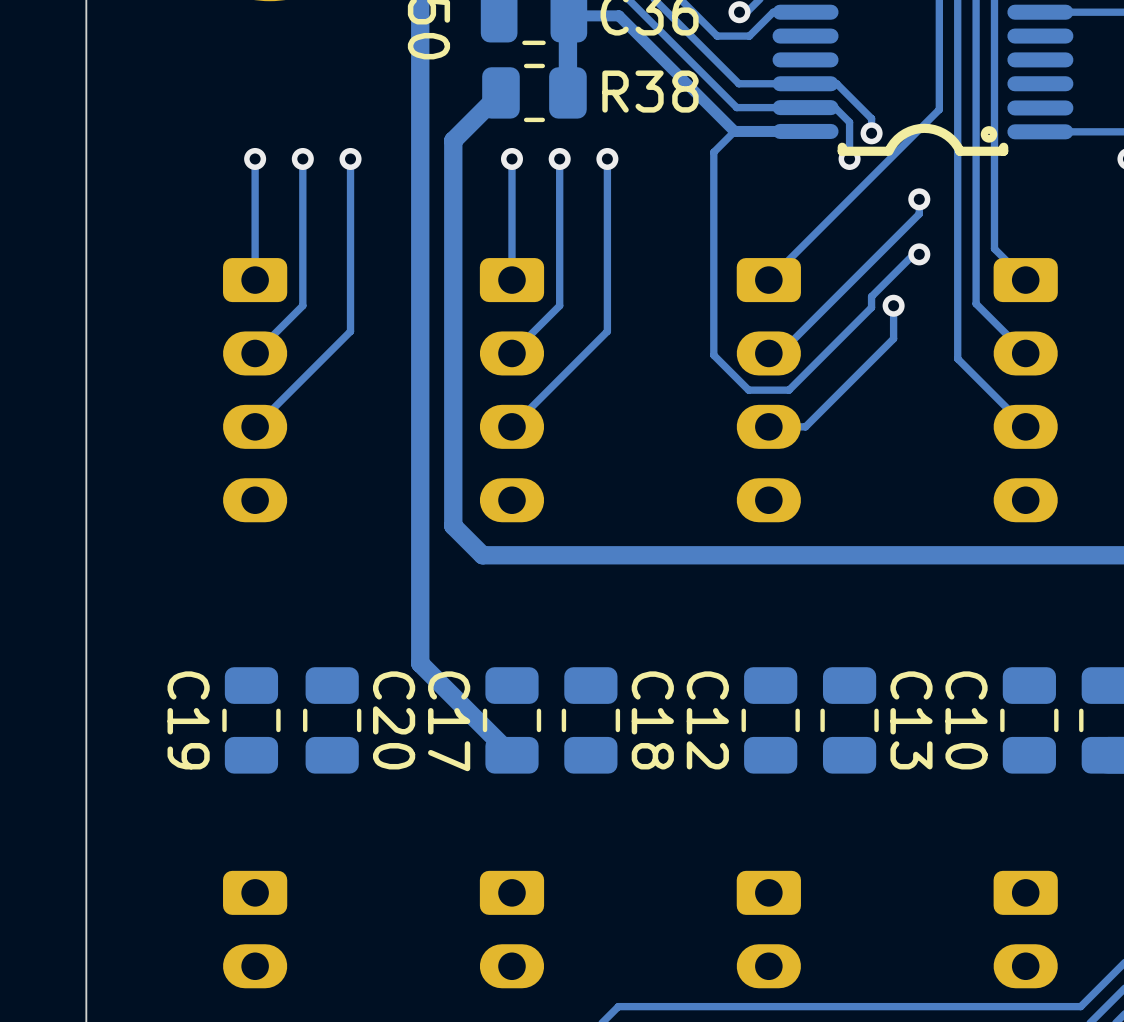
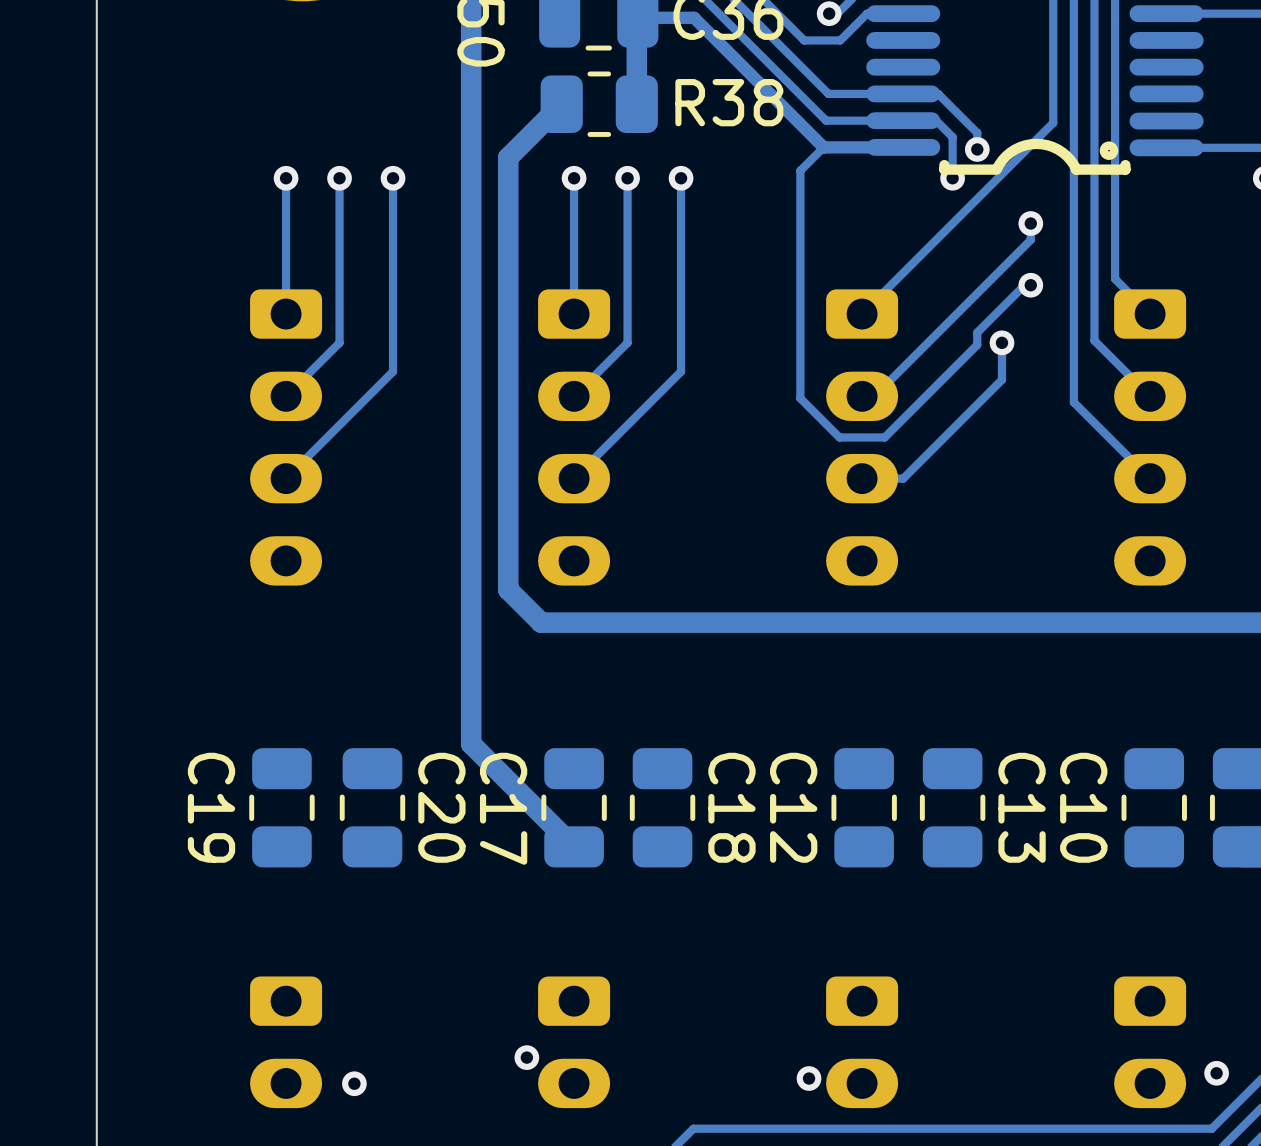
via: none -> (526, 1057)
via: none -> (1216, 1073)
via: none -> (809, 1078)
via: none -> (354, 1083)

